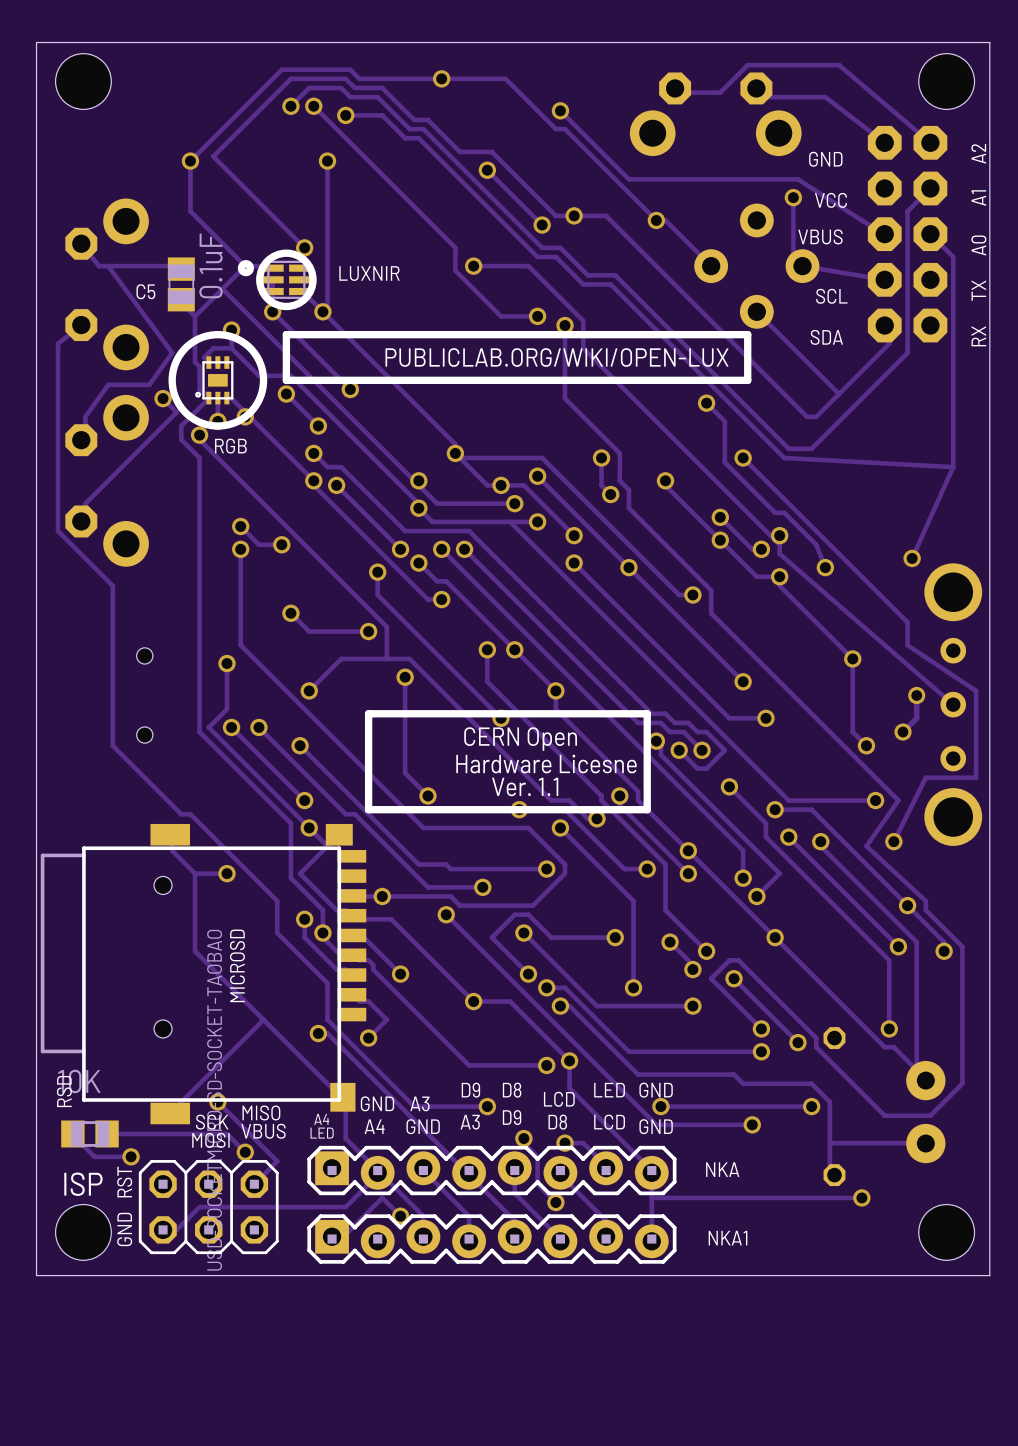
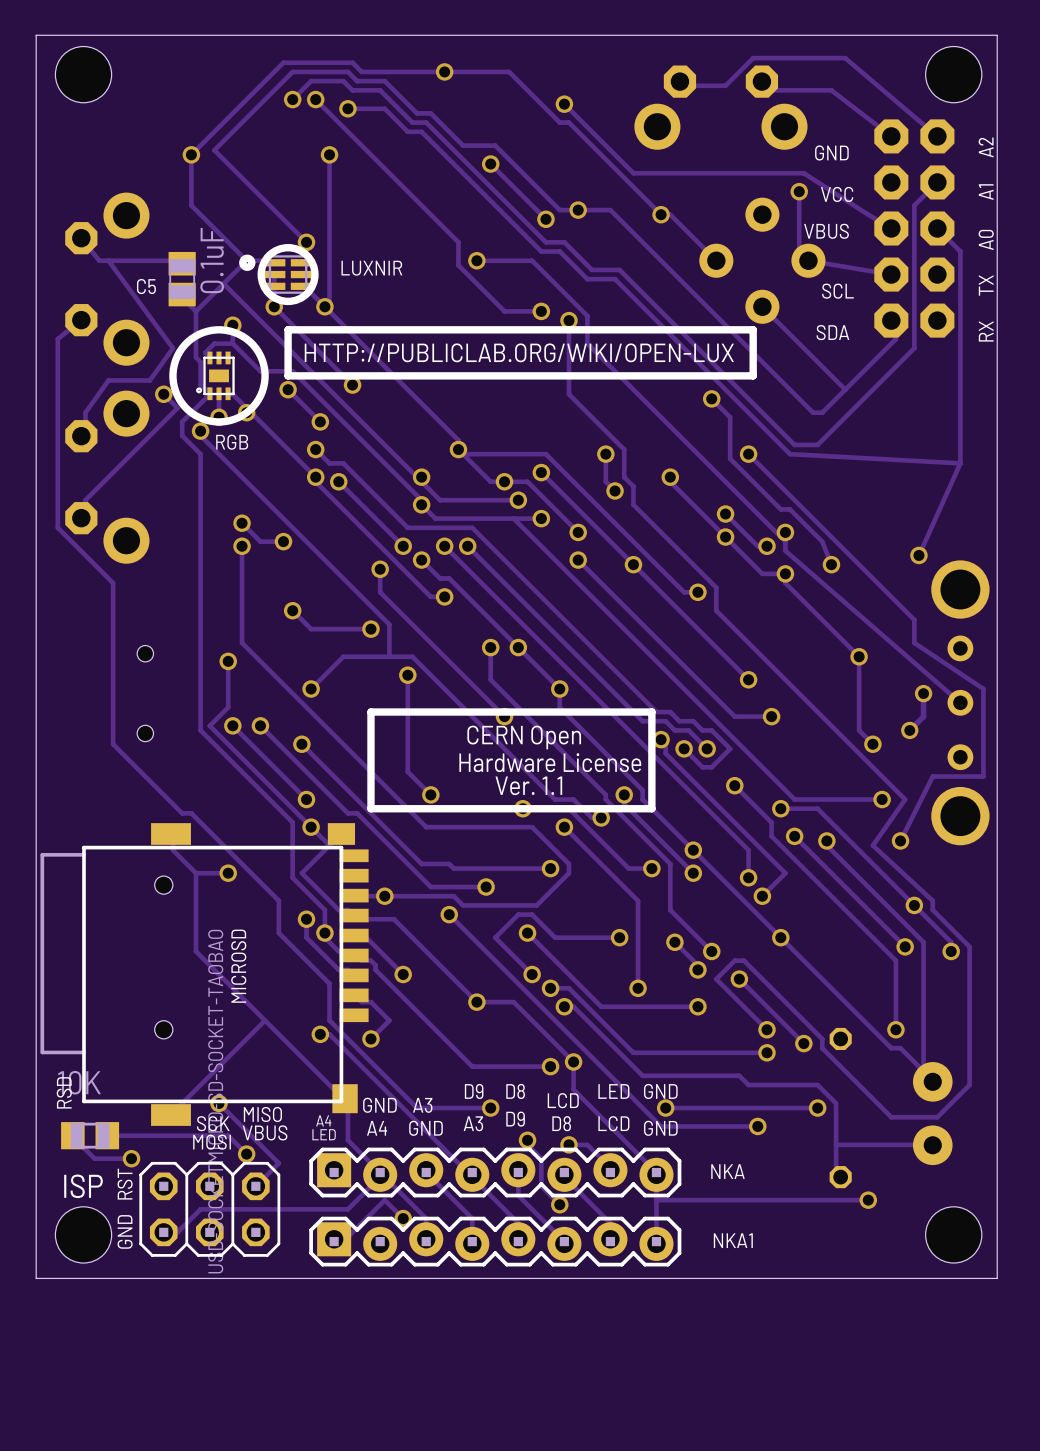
text: PUBLICLAB.ORG/WIKI/OPEN-LUX (557, 357) -> HTTP://PUBLICLAB.ORG/WIKI/OPEN-LUX (519, 352)
text: Hardware Licesne (546, 764) -> Hardware License (550, 762)

